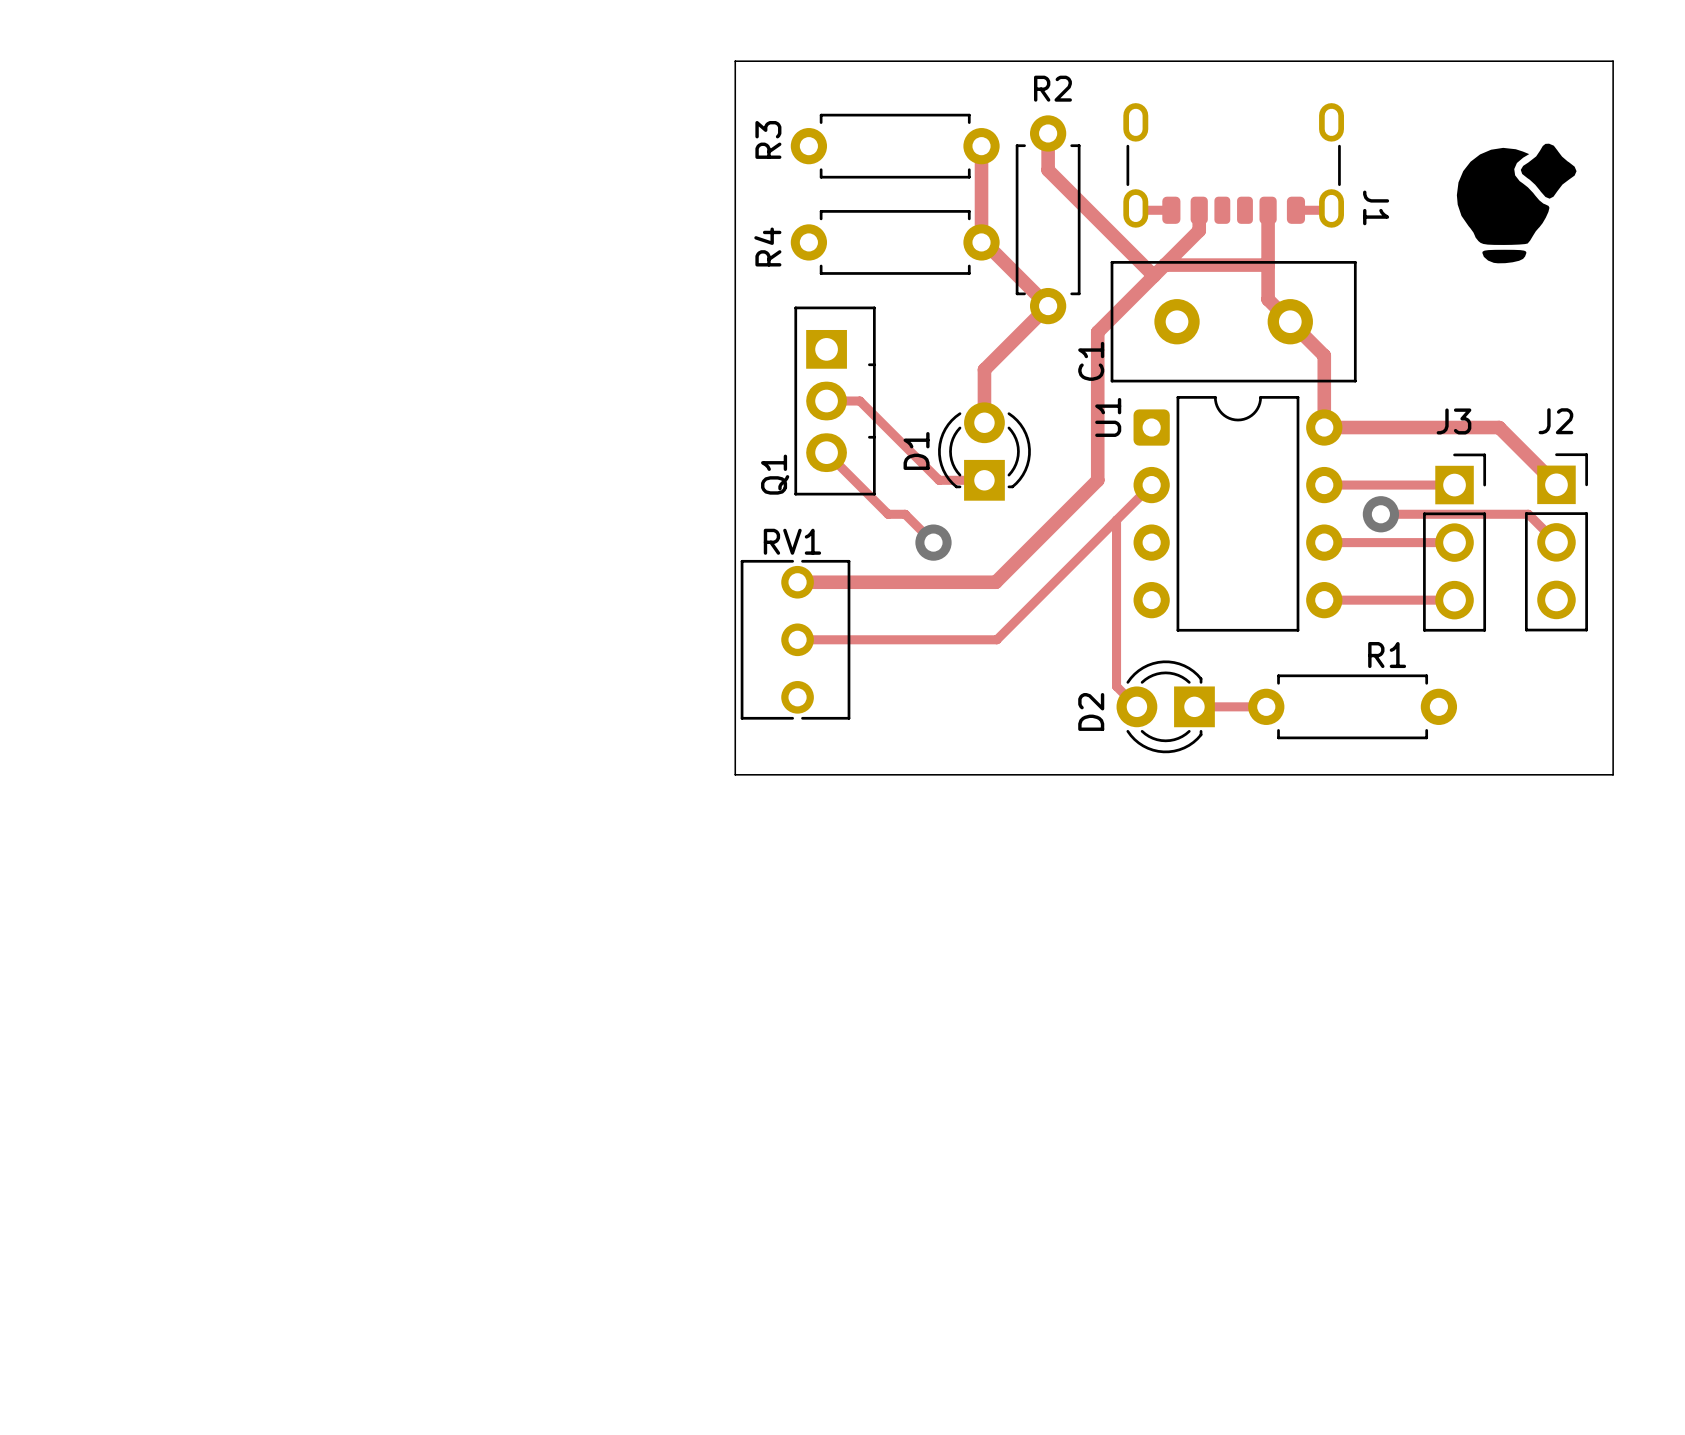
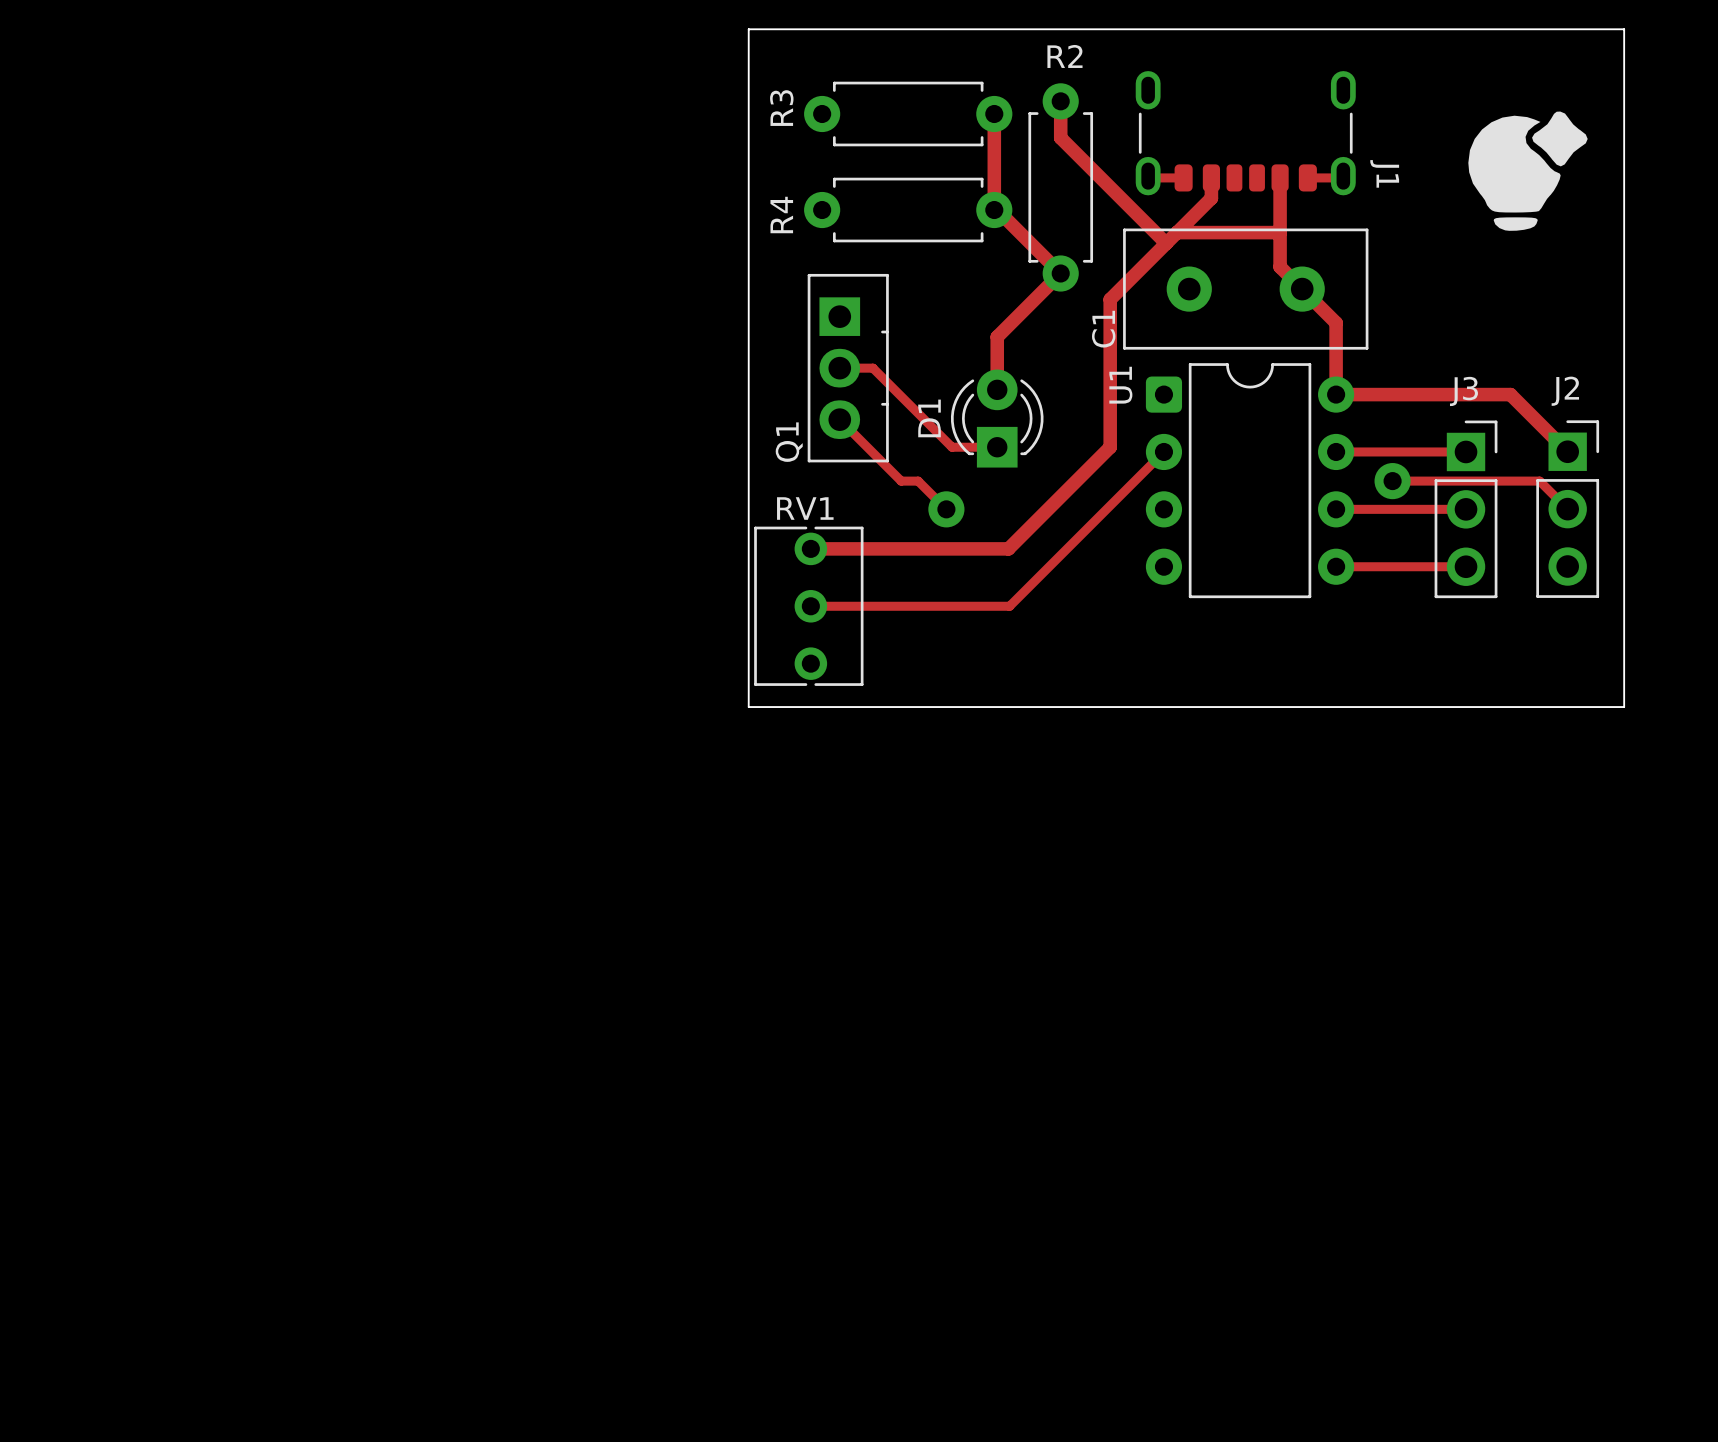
track: (1116, 520) (1116, 686) (1134, 704) (1132, 705) -> none
D2: (1165, 706) -> none
track: (1194, 706) (1266, 706) -> none
R1: (1352, 706) -> none
board edge: (735, 740) (735, 774) (1613, 774) (1613, 740) -> (748, 707) (1624, 707)

